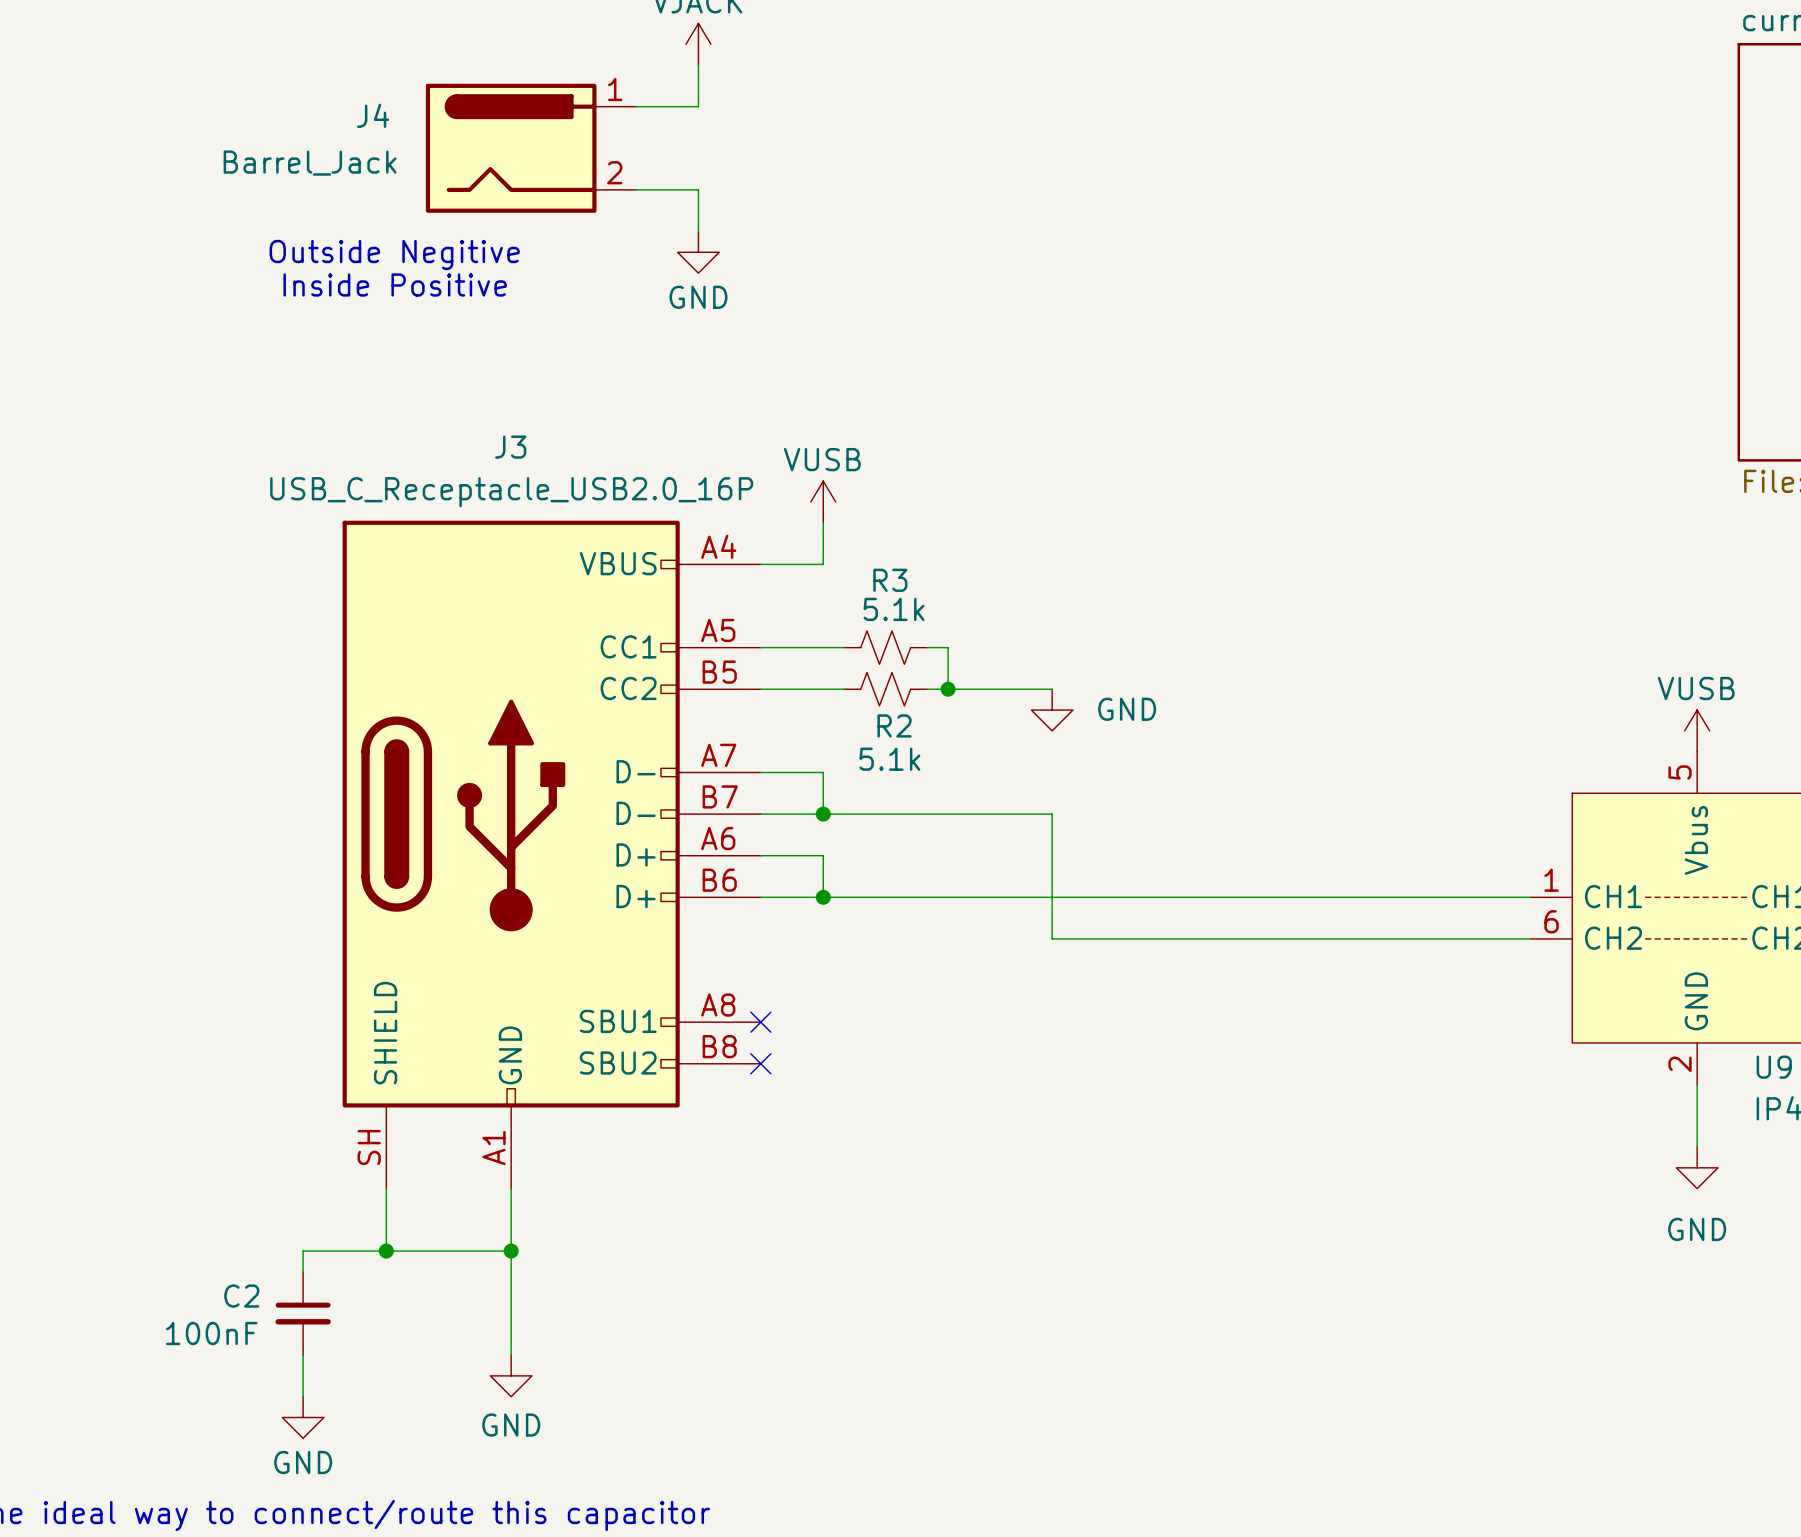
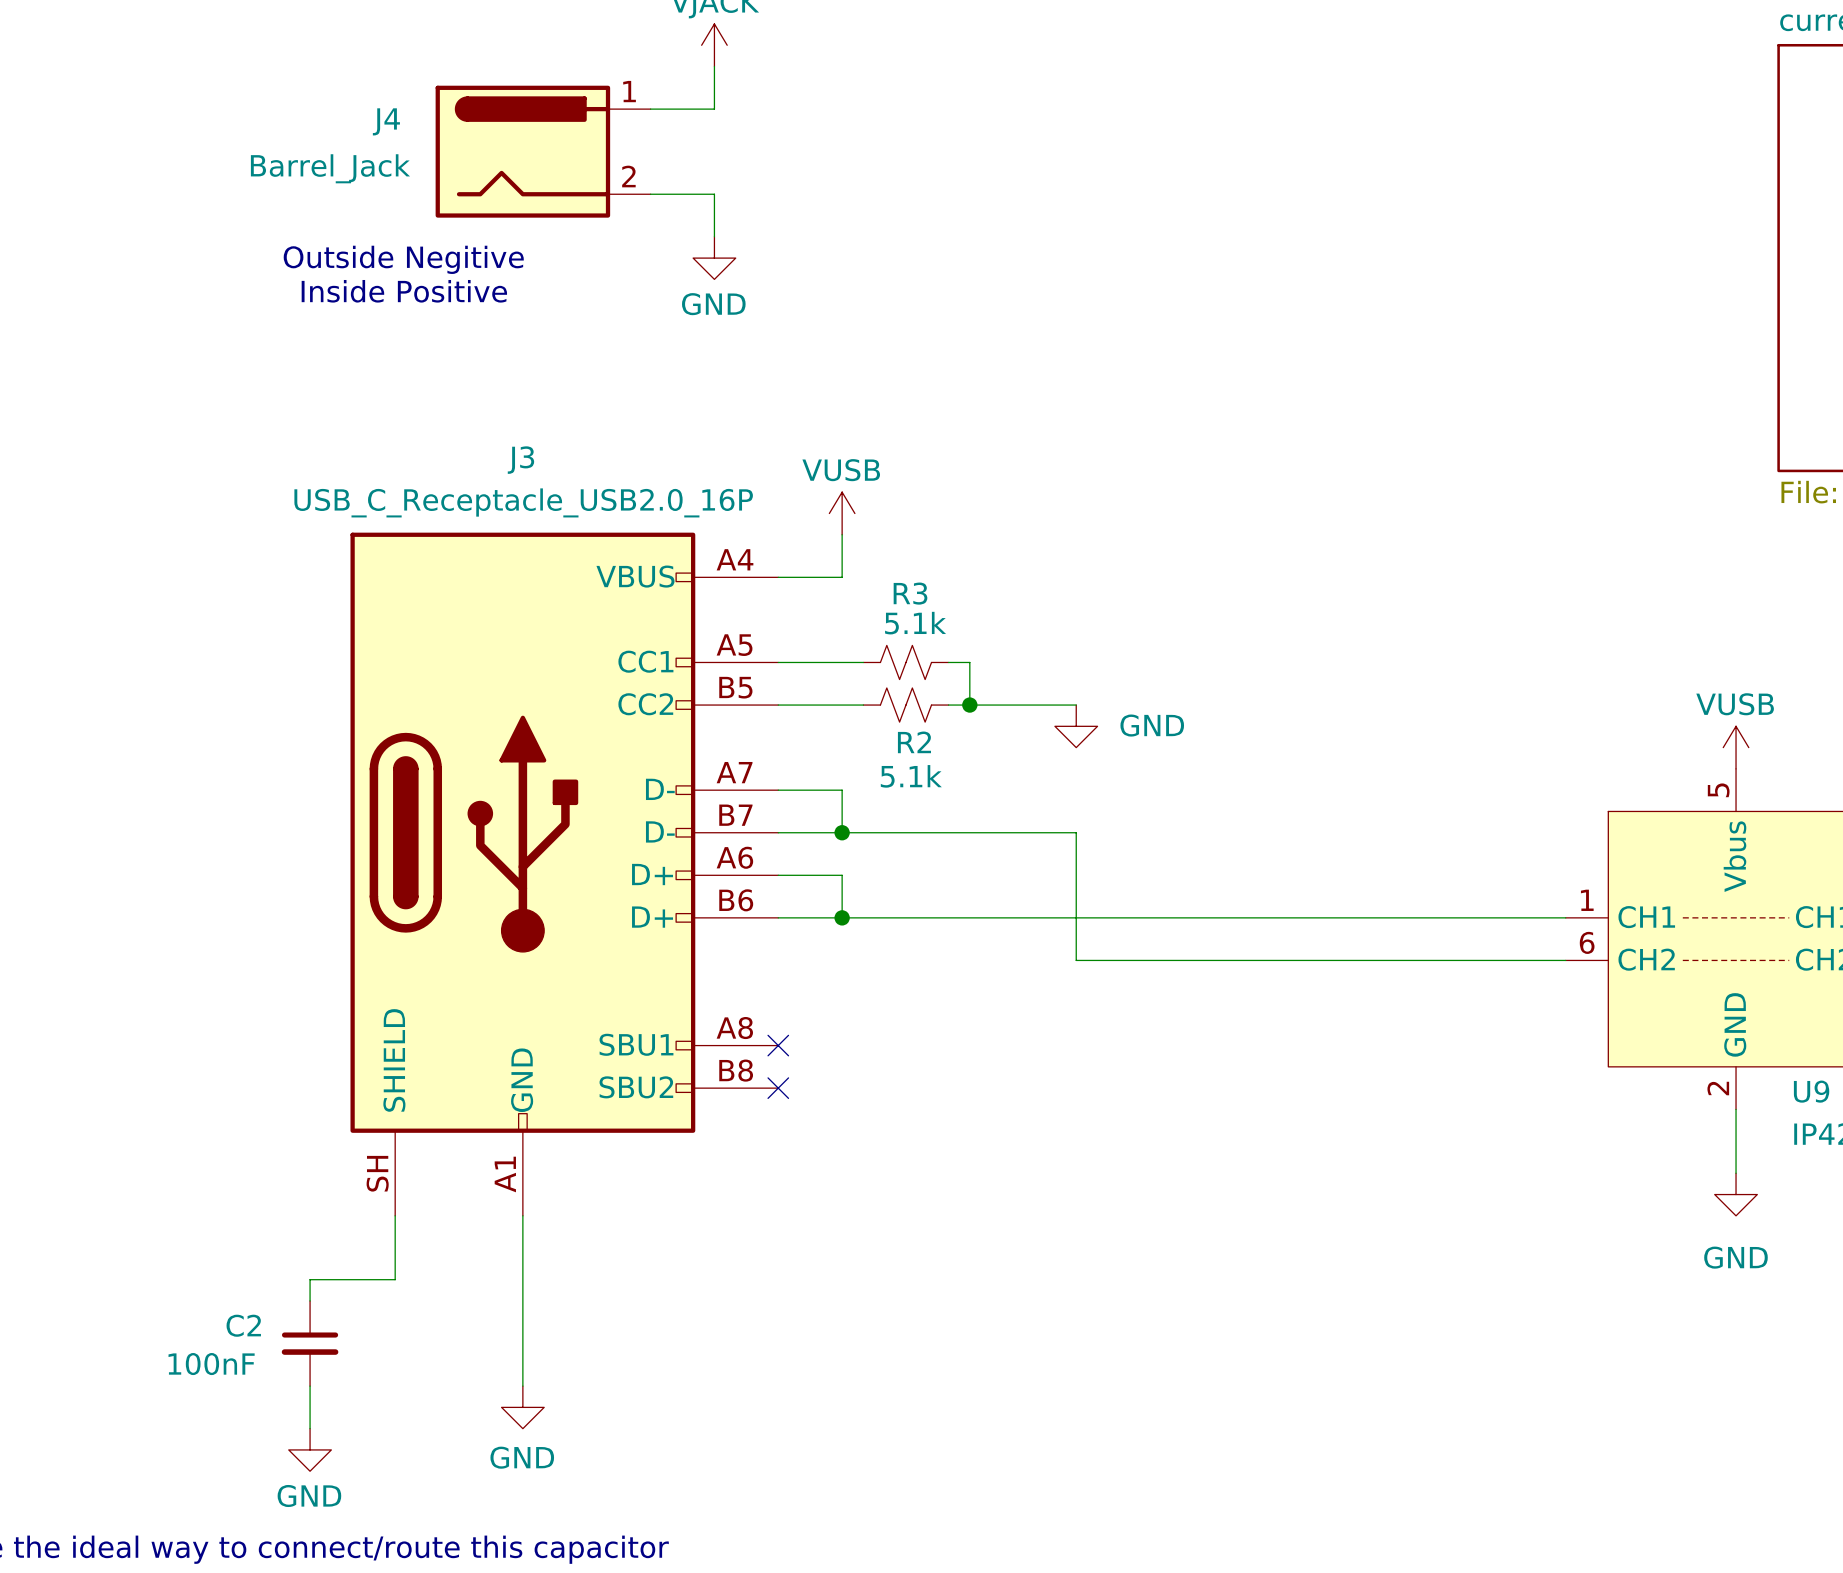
wire: (386, 1251) (511, 1251) -> none
junction: (386, 1251) -> none
junction: (511, 1251) -> none

